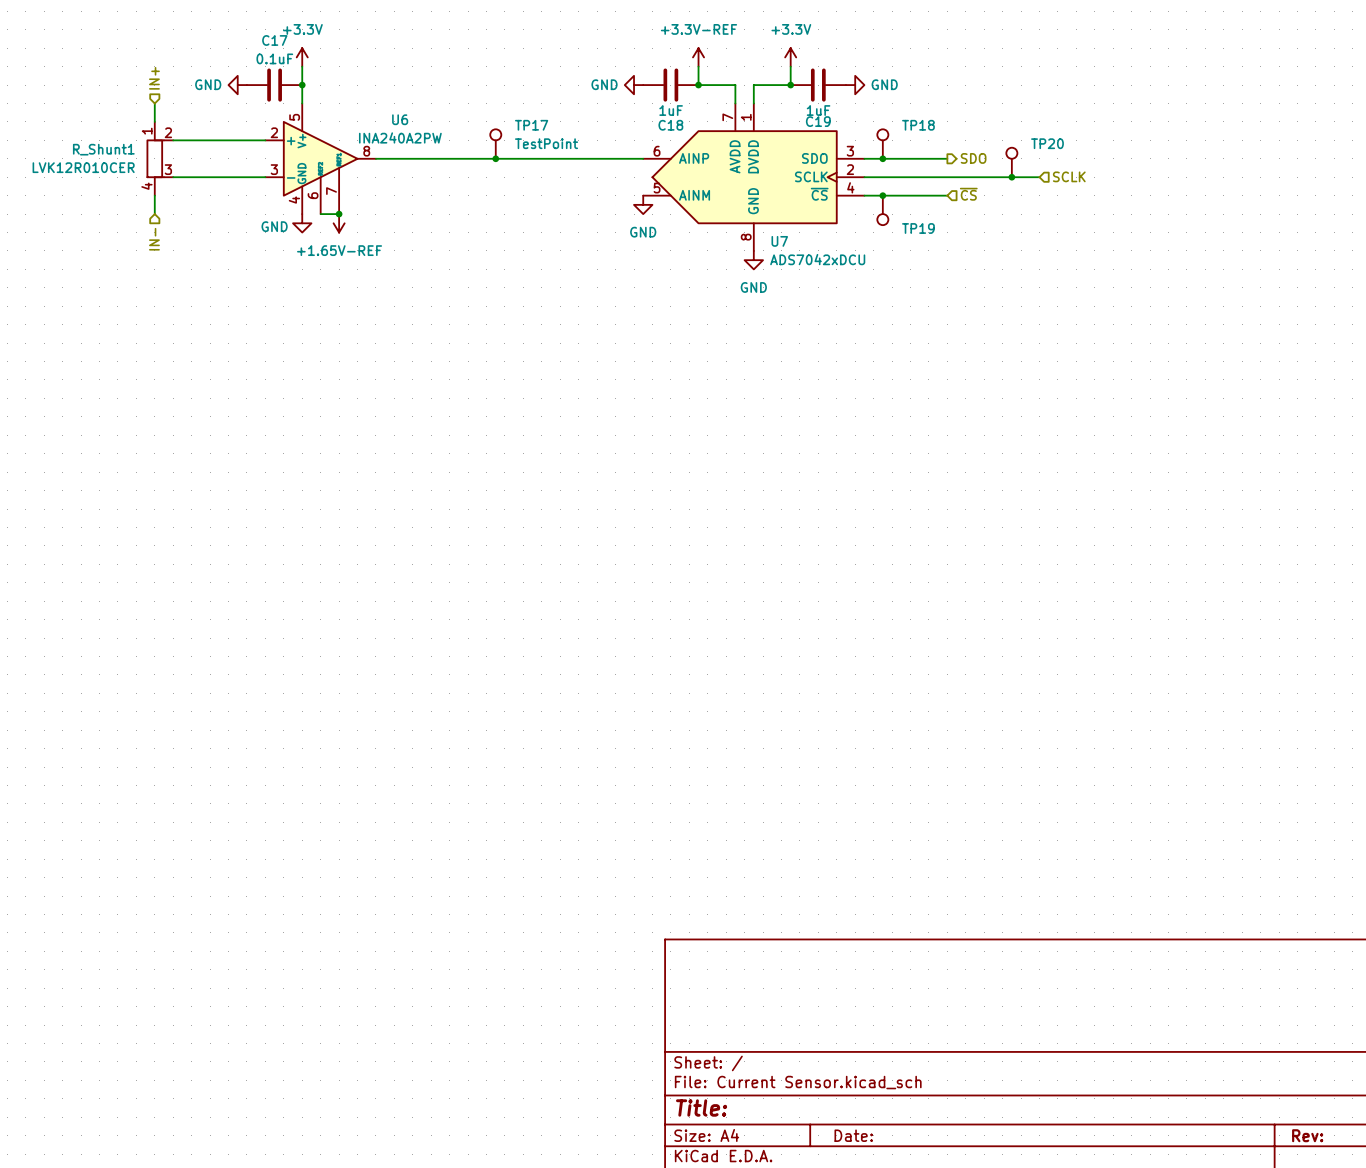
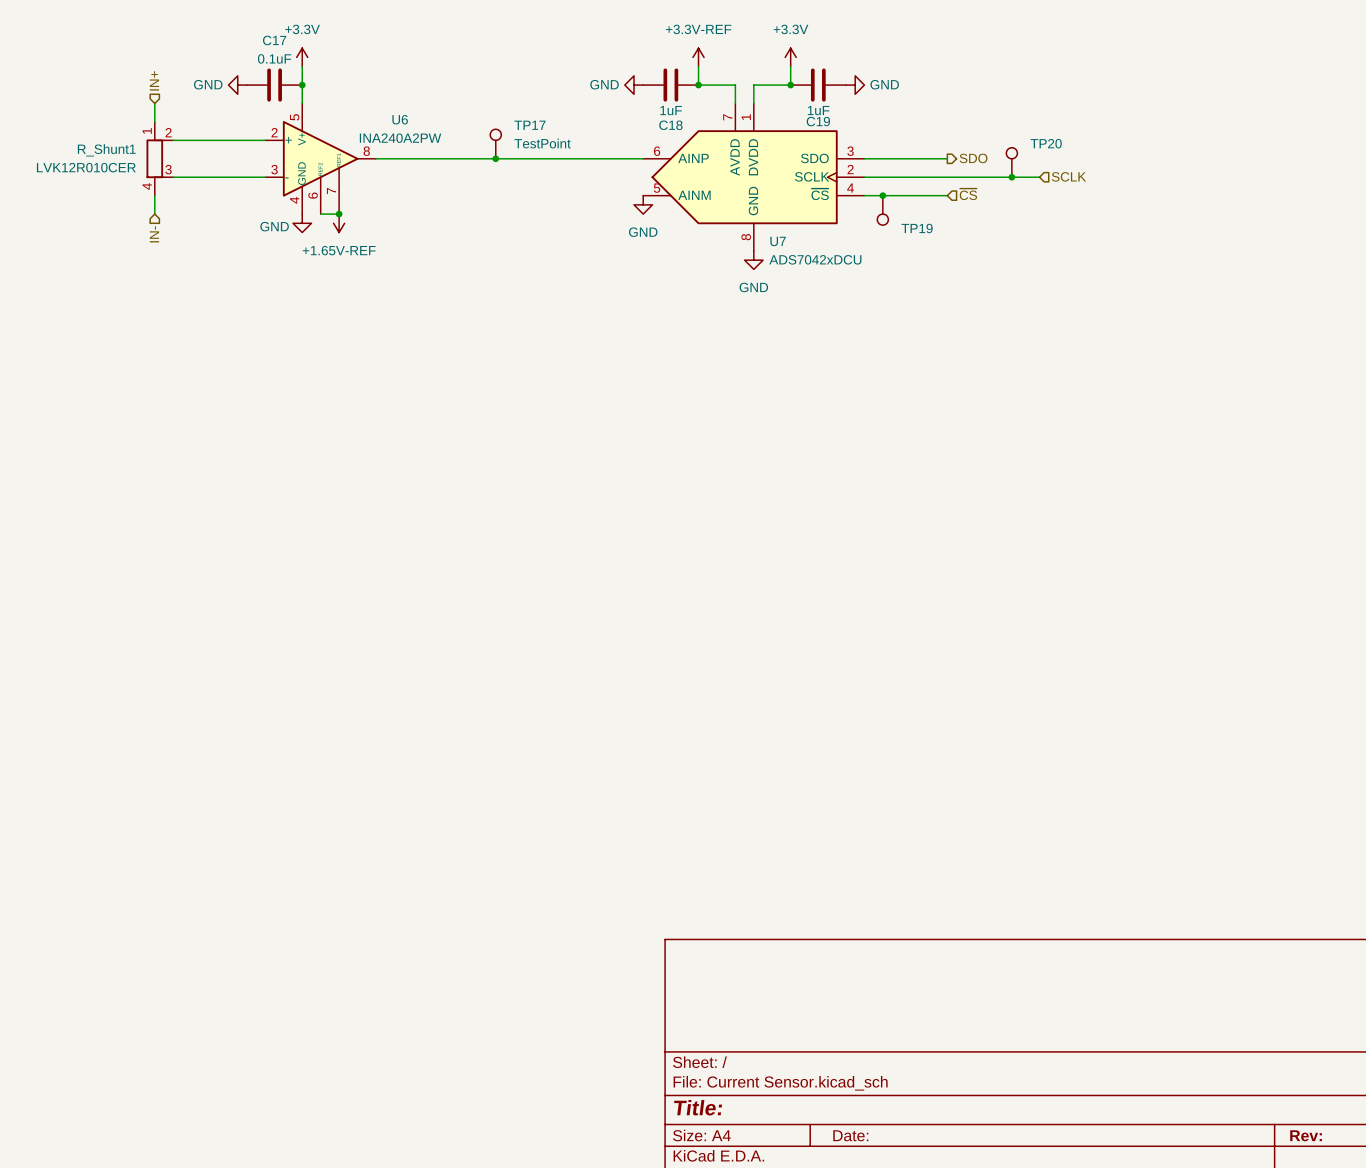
TP18: (882, 144) -> none
junction: (882, 158) -> none

